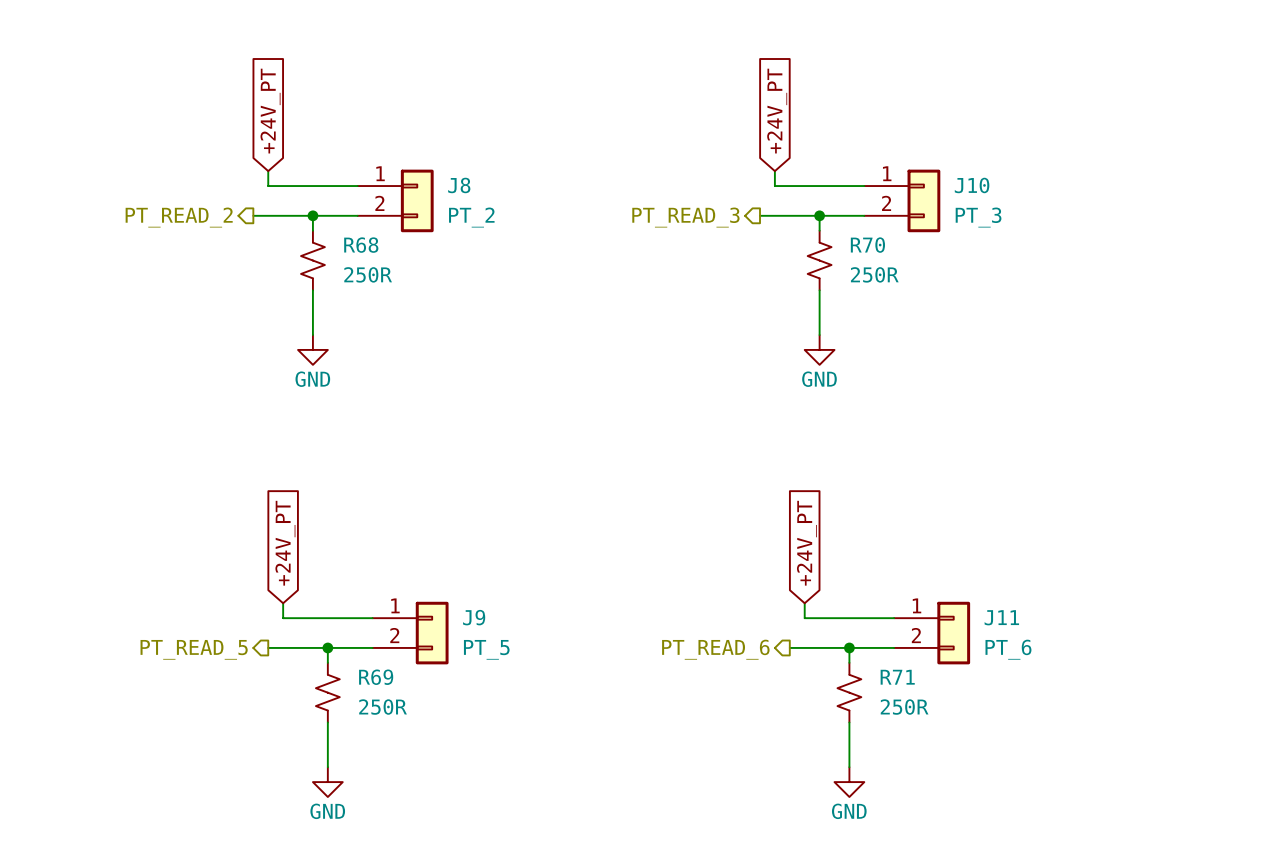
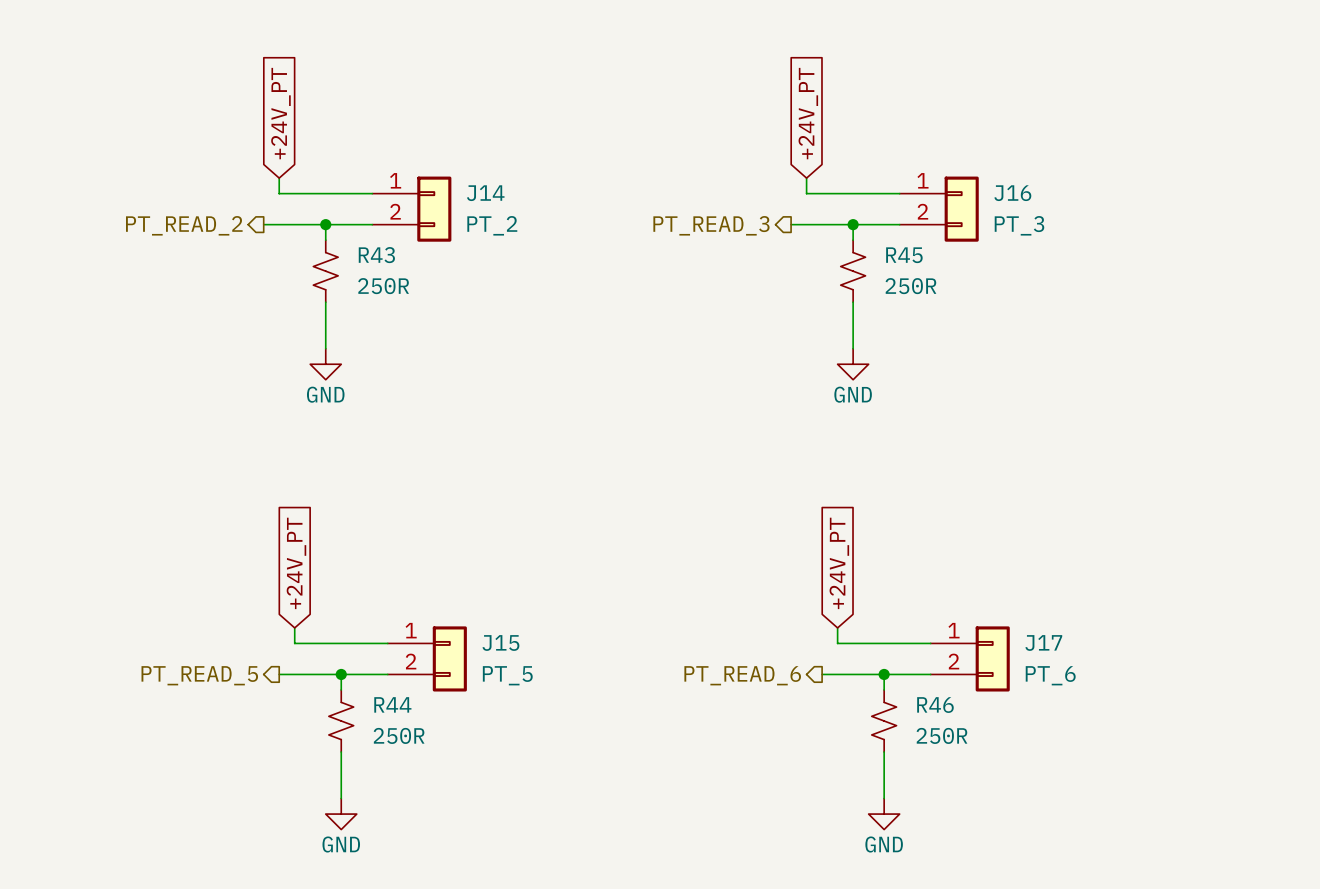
J8 name: J8 (459, 185) -> J14 (485, 193)
J10 name: J10 (972, 185) -> J16 (1012, 193)
R68 name: R68 (361, 245) -> R43 (376, 255)
R70 name: R70 (867, 245) -> R45 (904, 255)
J9 name: J9 (474, 617) -> J15 (500, 642)
J11 name: J11 (1001, 617) -> J17 (1043, 642)
R69 name: R69 (376, 677) -> R44 (392, 704)
R71 name: R71 (897, 677) -> R46 (935, 705)

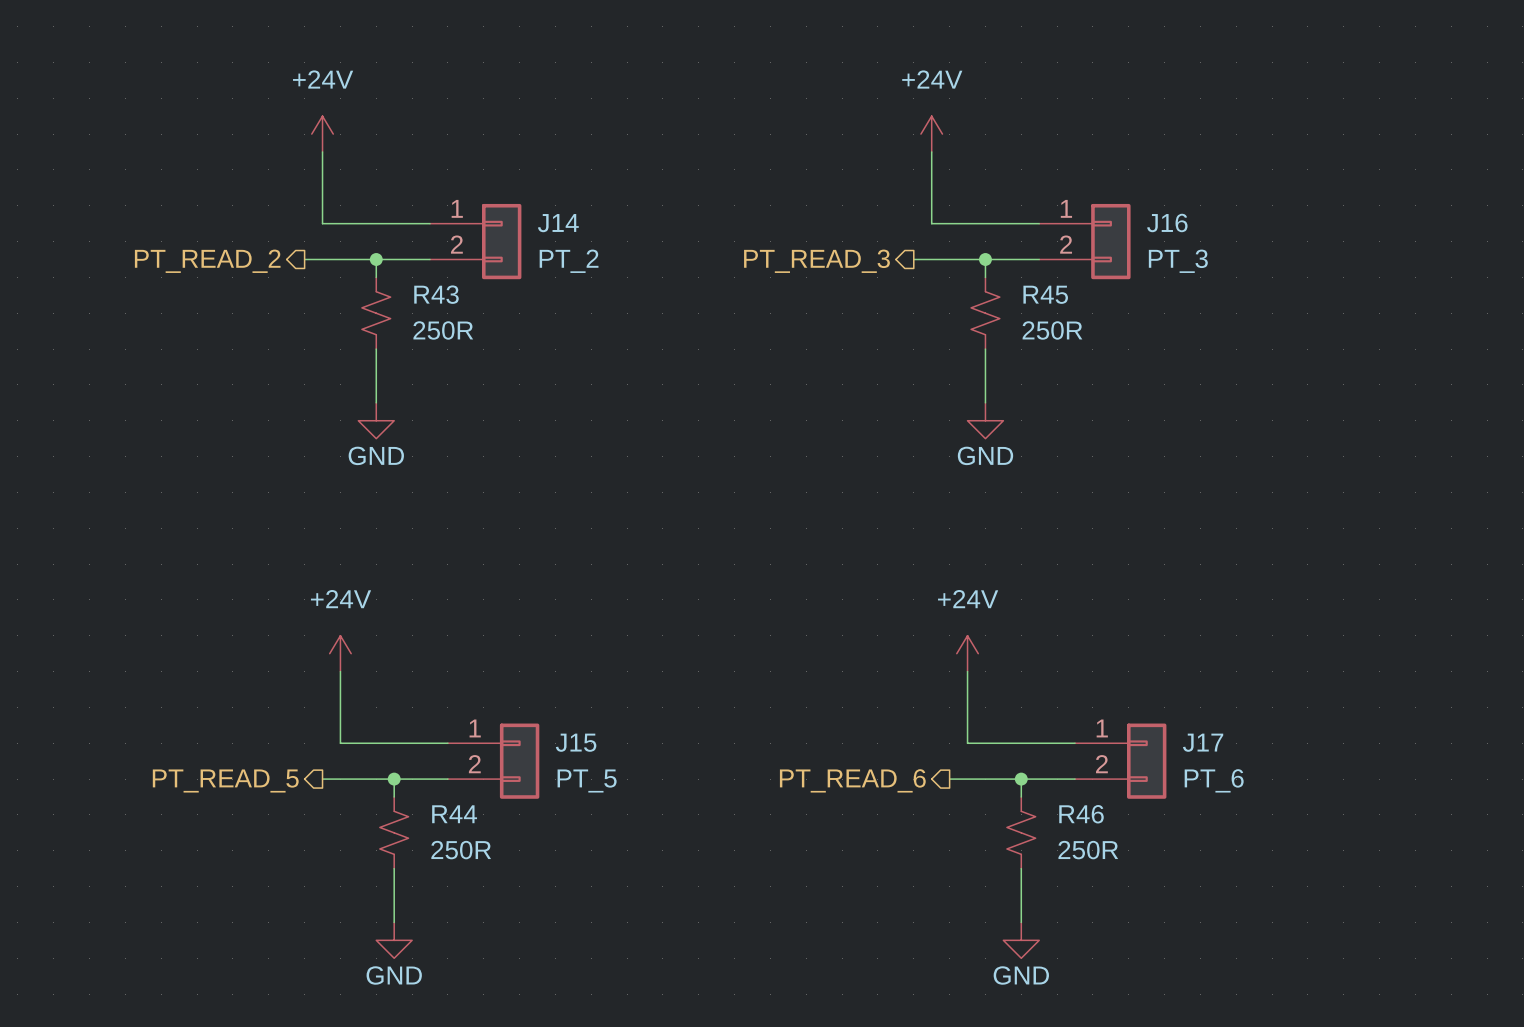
global label: +24V_PT (280, 113) -> none
global label: +24V_PT (808, 113) -> none
power symbol: none -> +24V (322, 134)
power symbol: none -> +24V (931, 134)
wire: none -> (322, 151) (322, 205)
wire: none -> (931, 151) (931, 205)
global label: +24V_PT (296, 563) -> none
global label: +24V_PT (839, 563) -> none
power symbol: none -> +24V (340, 653)
power symbol: none -> +24V (967, 653)
wire: none -> (340, 671) (340, 725)
wire: none -> (967, 671) (967, 725)

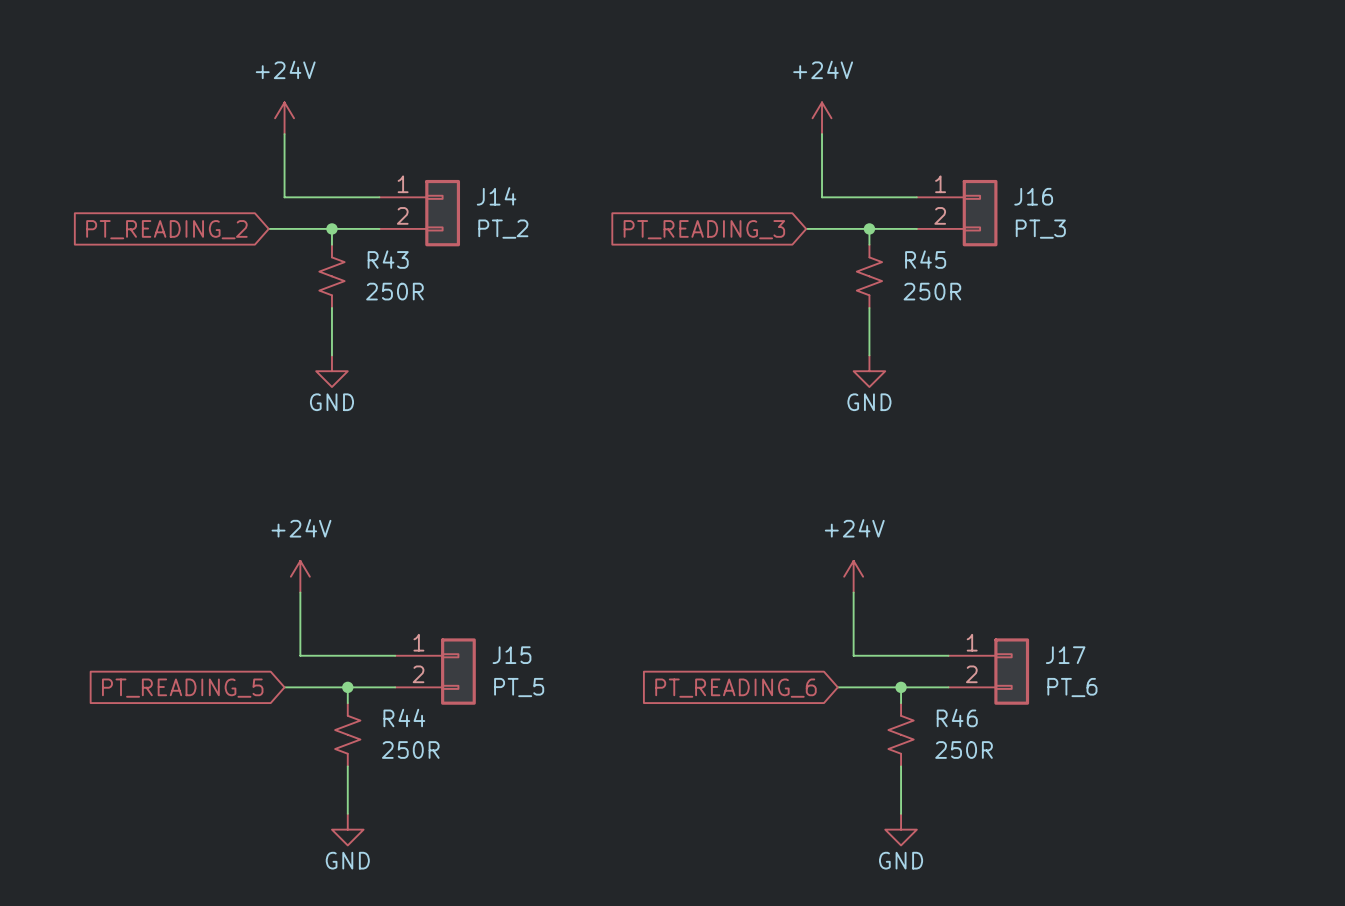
global label: none -> PT_READING_2 (166, 229)
hierarchical label: PT_READ_2 (207, 261) -> none
global label: none -> PT_READING_3 (704, 229)
hierarchical label: PT_READ_3 (816, 261) -> none
hierarchical label: PT_READ_6 (852, 780) -> none
global label: none -> PT_READING_5 (182, 688)
hierarchical label: PT_READ_5 (225, 781) -> none
global label: none -> PT_READING_6 (735, 688)

